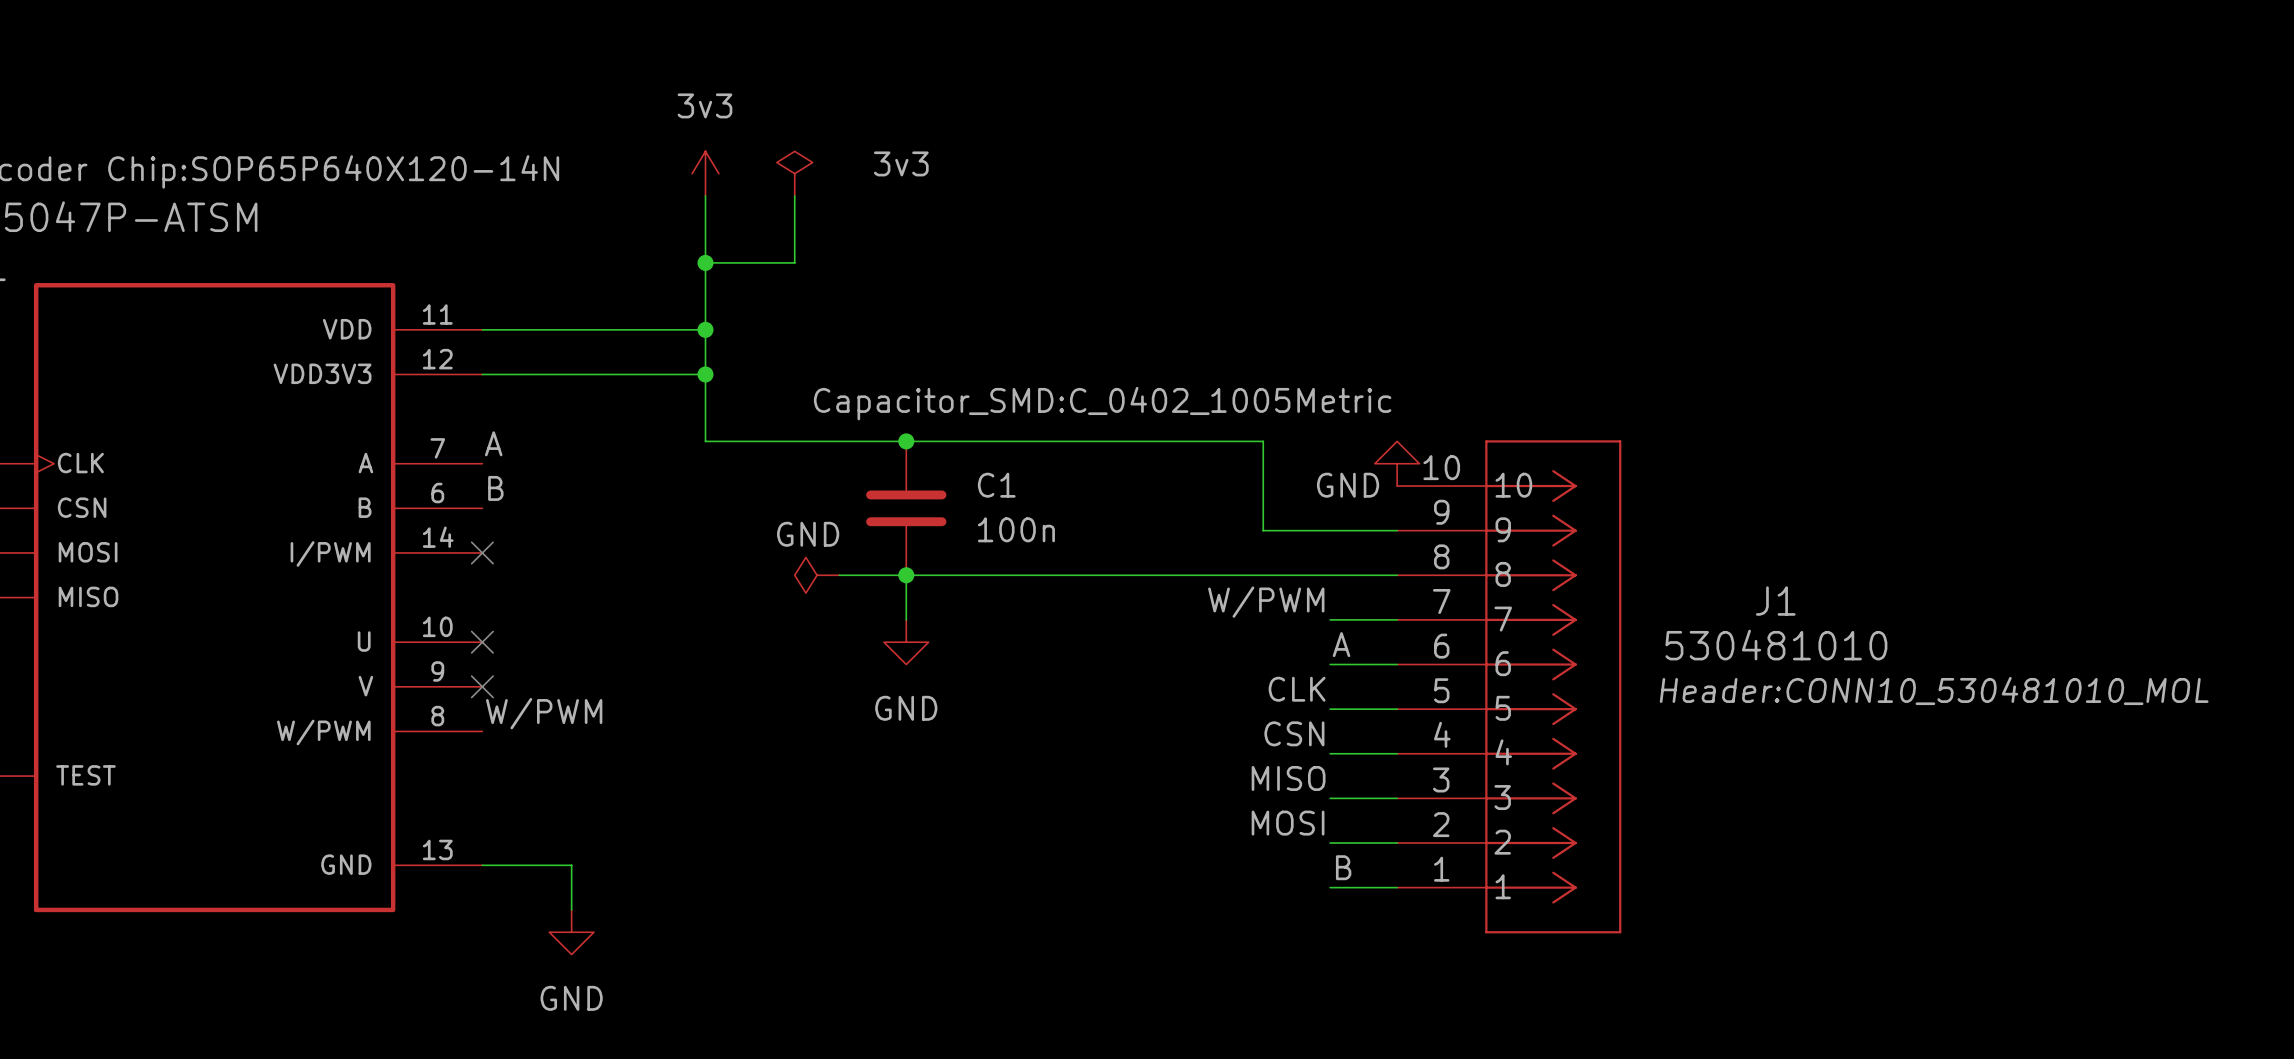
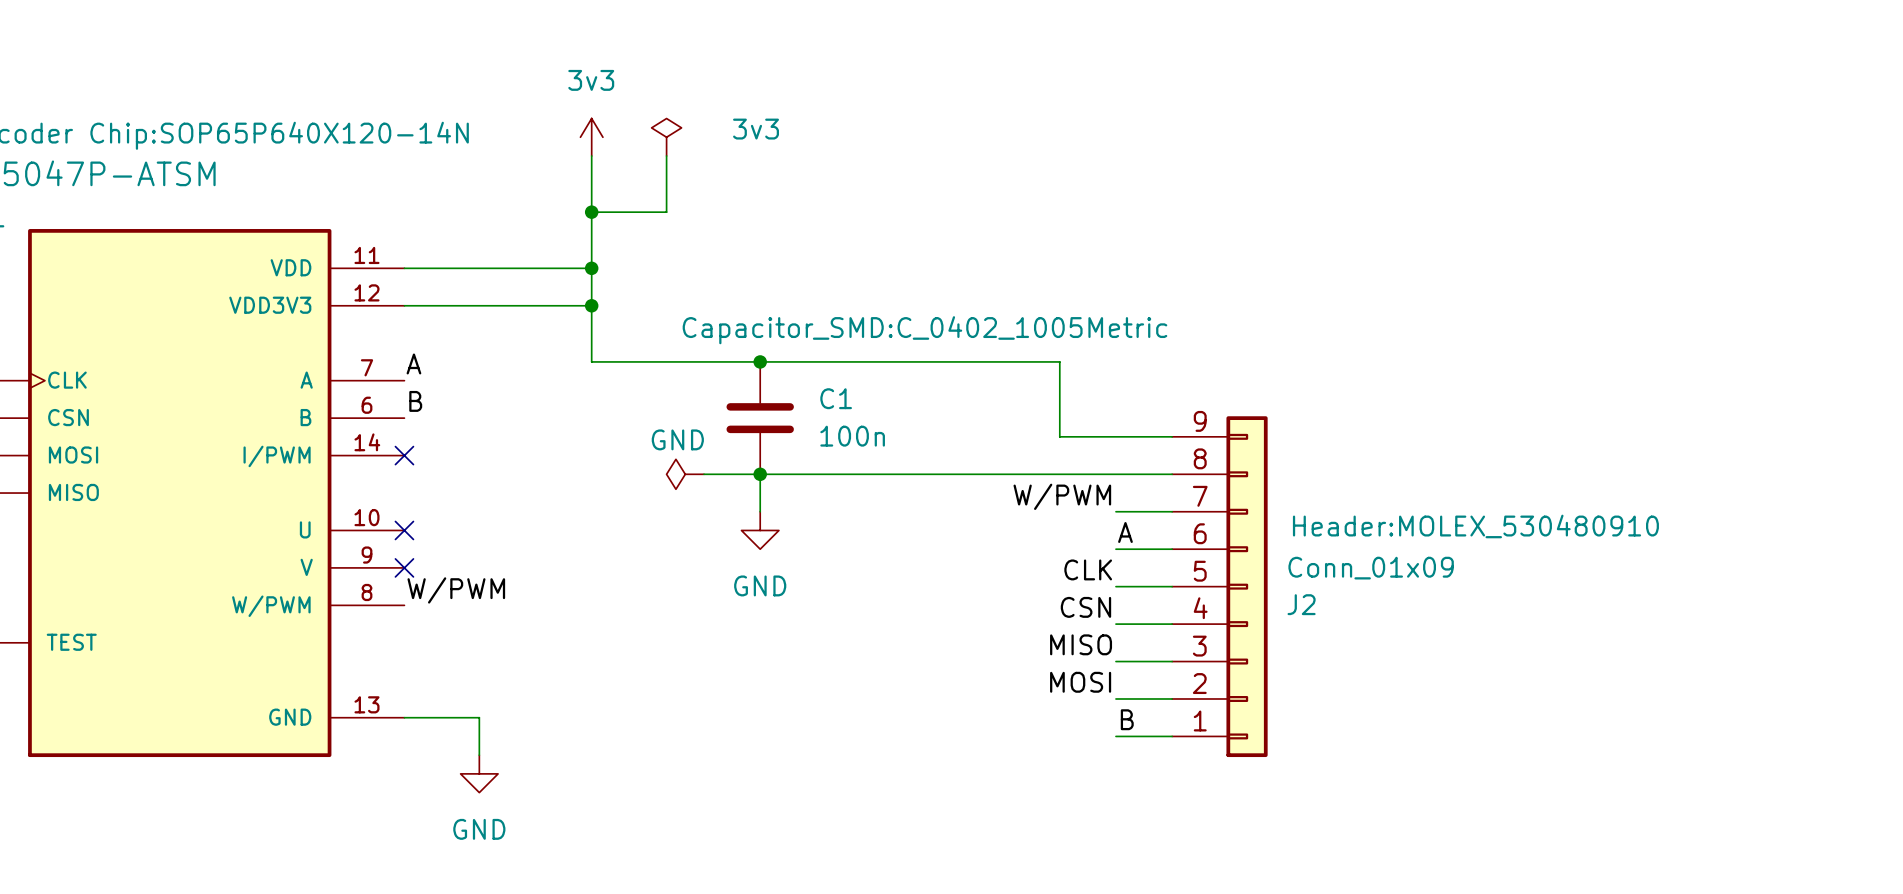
power symbol: GND (1397, 463) -> none
J1: 530481010 (1509, 686) -> none
J2: none -> Conn_01x09 (1219, 586)

